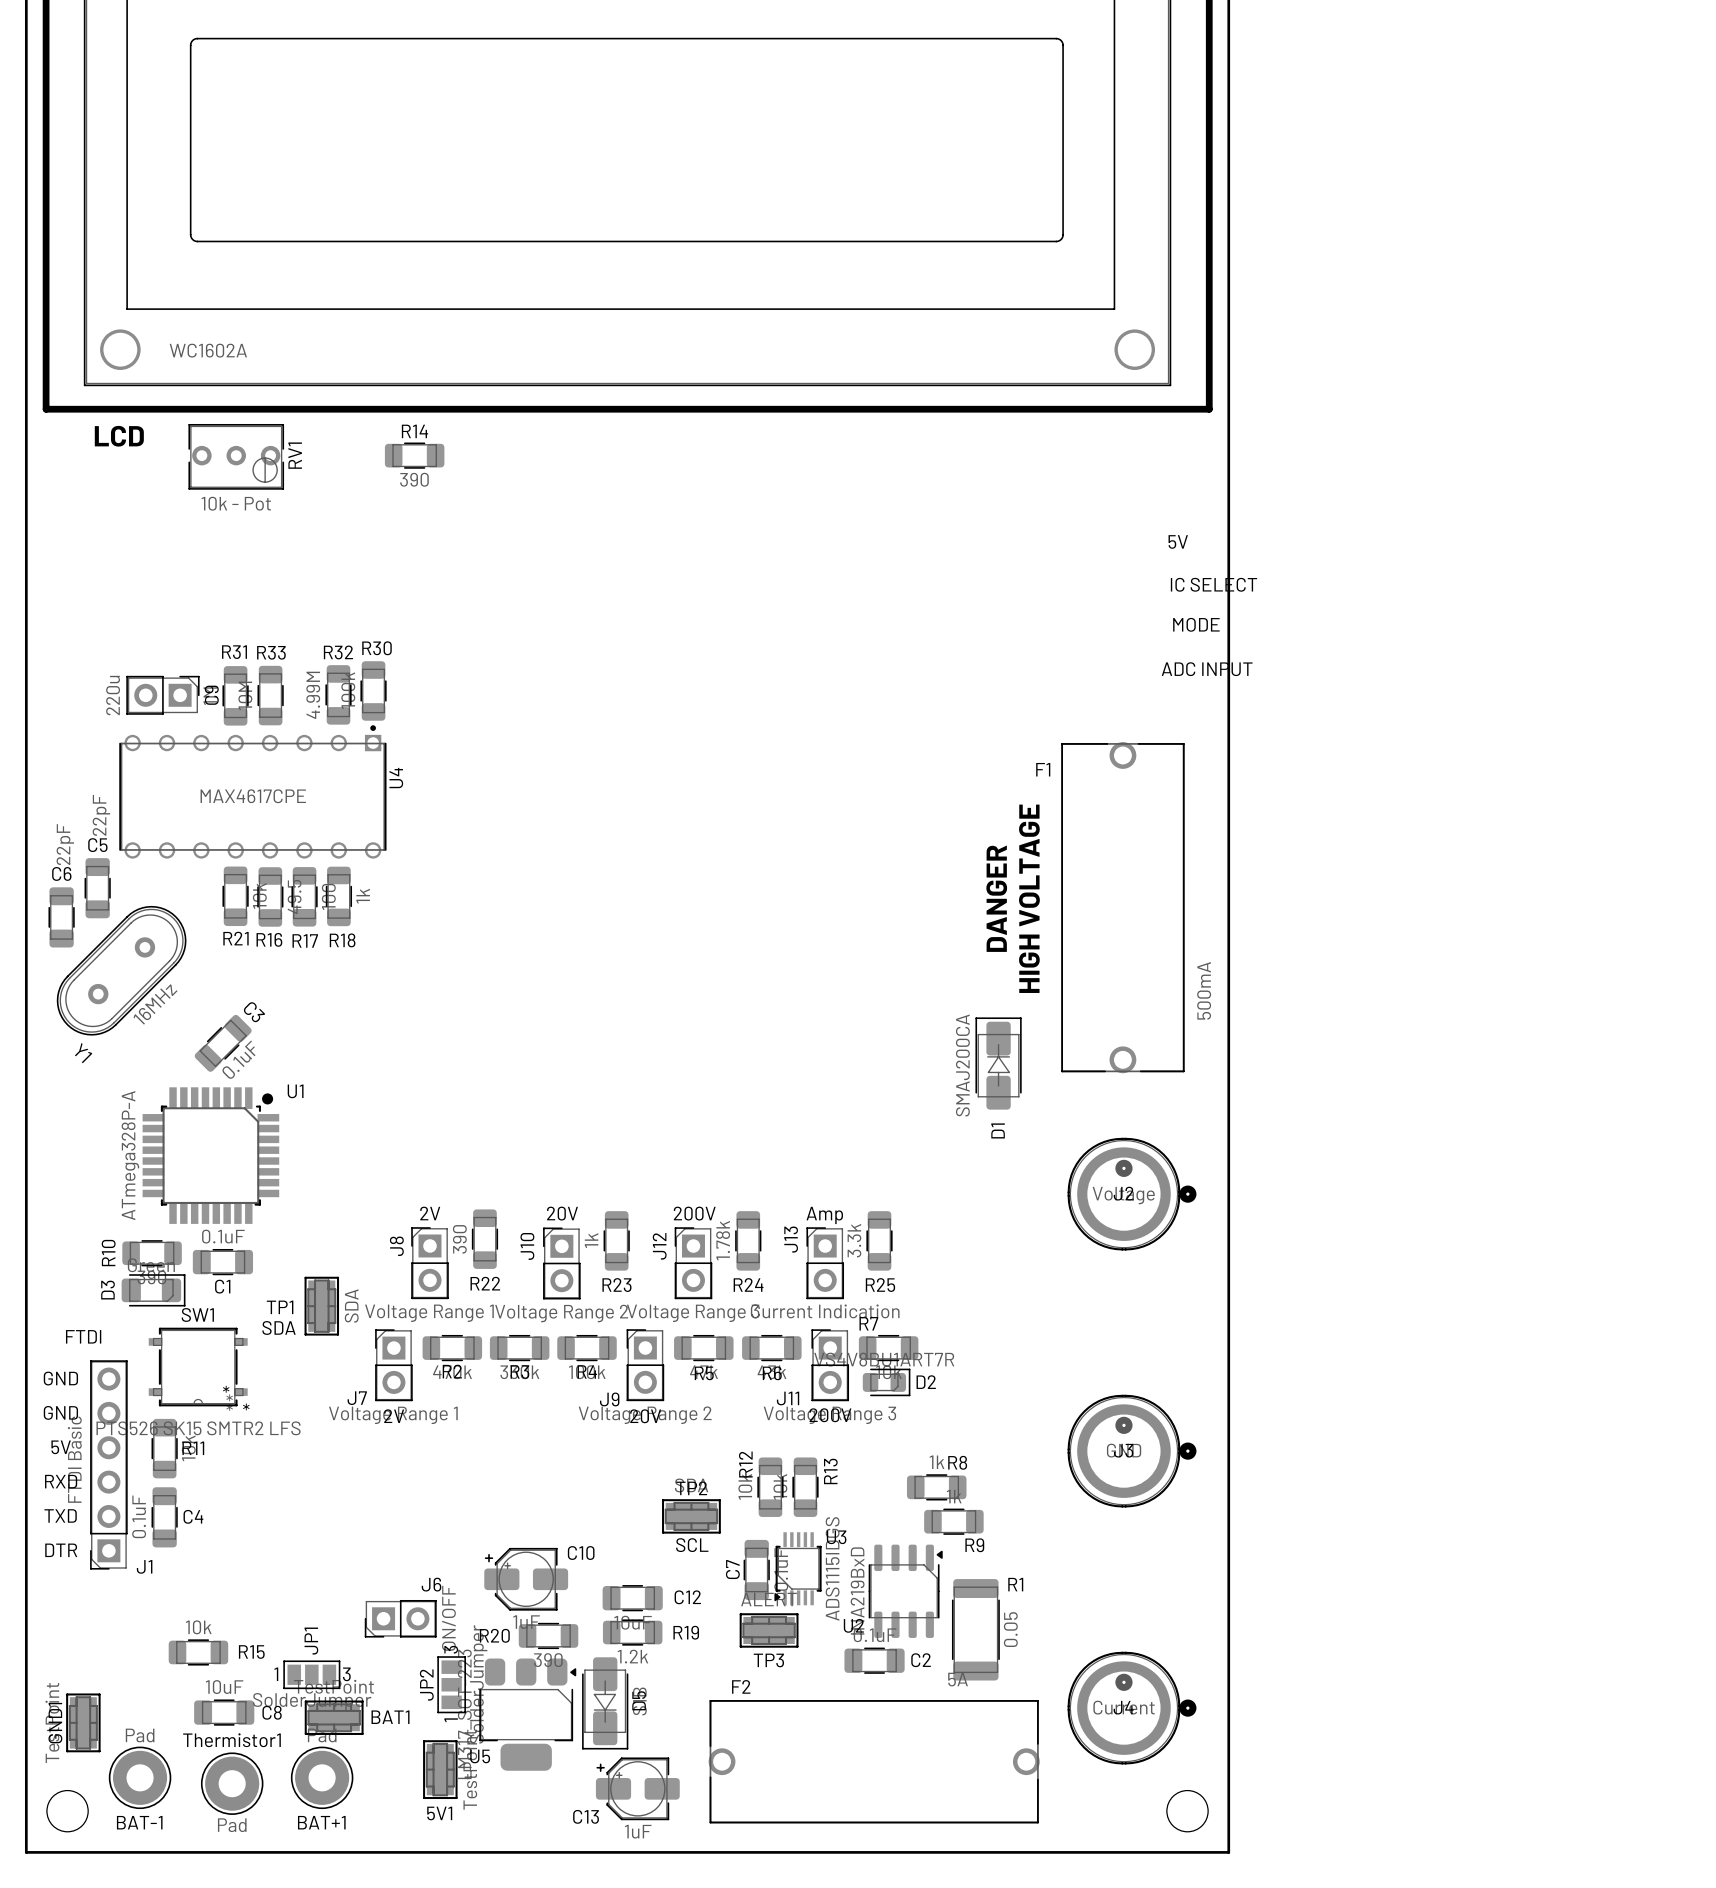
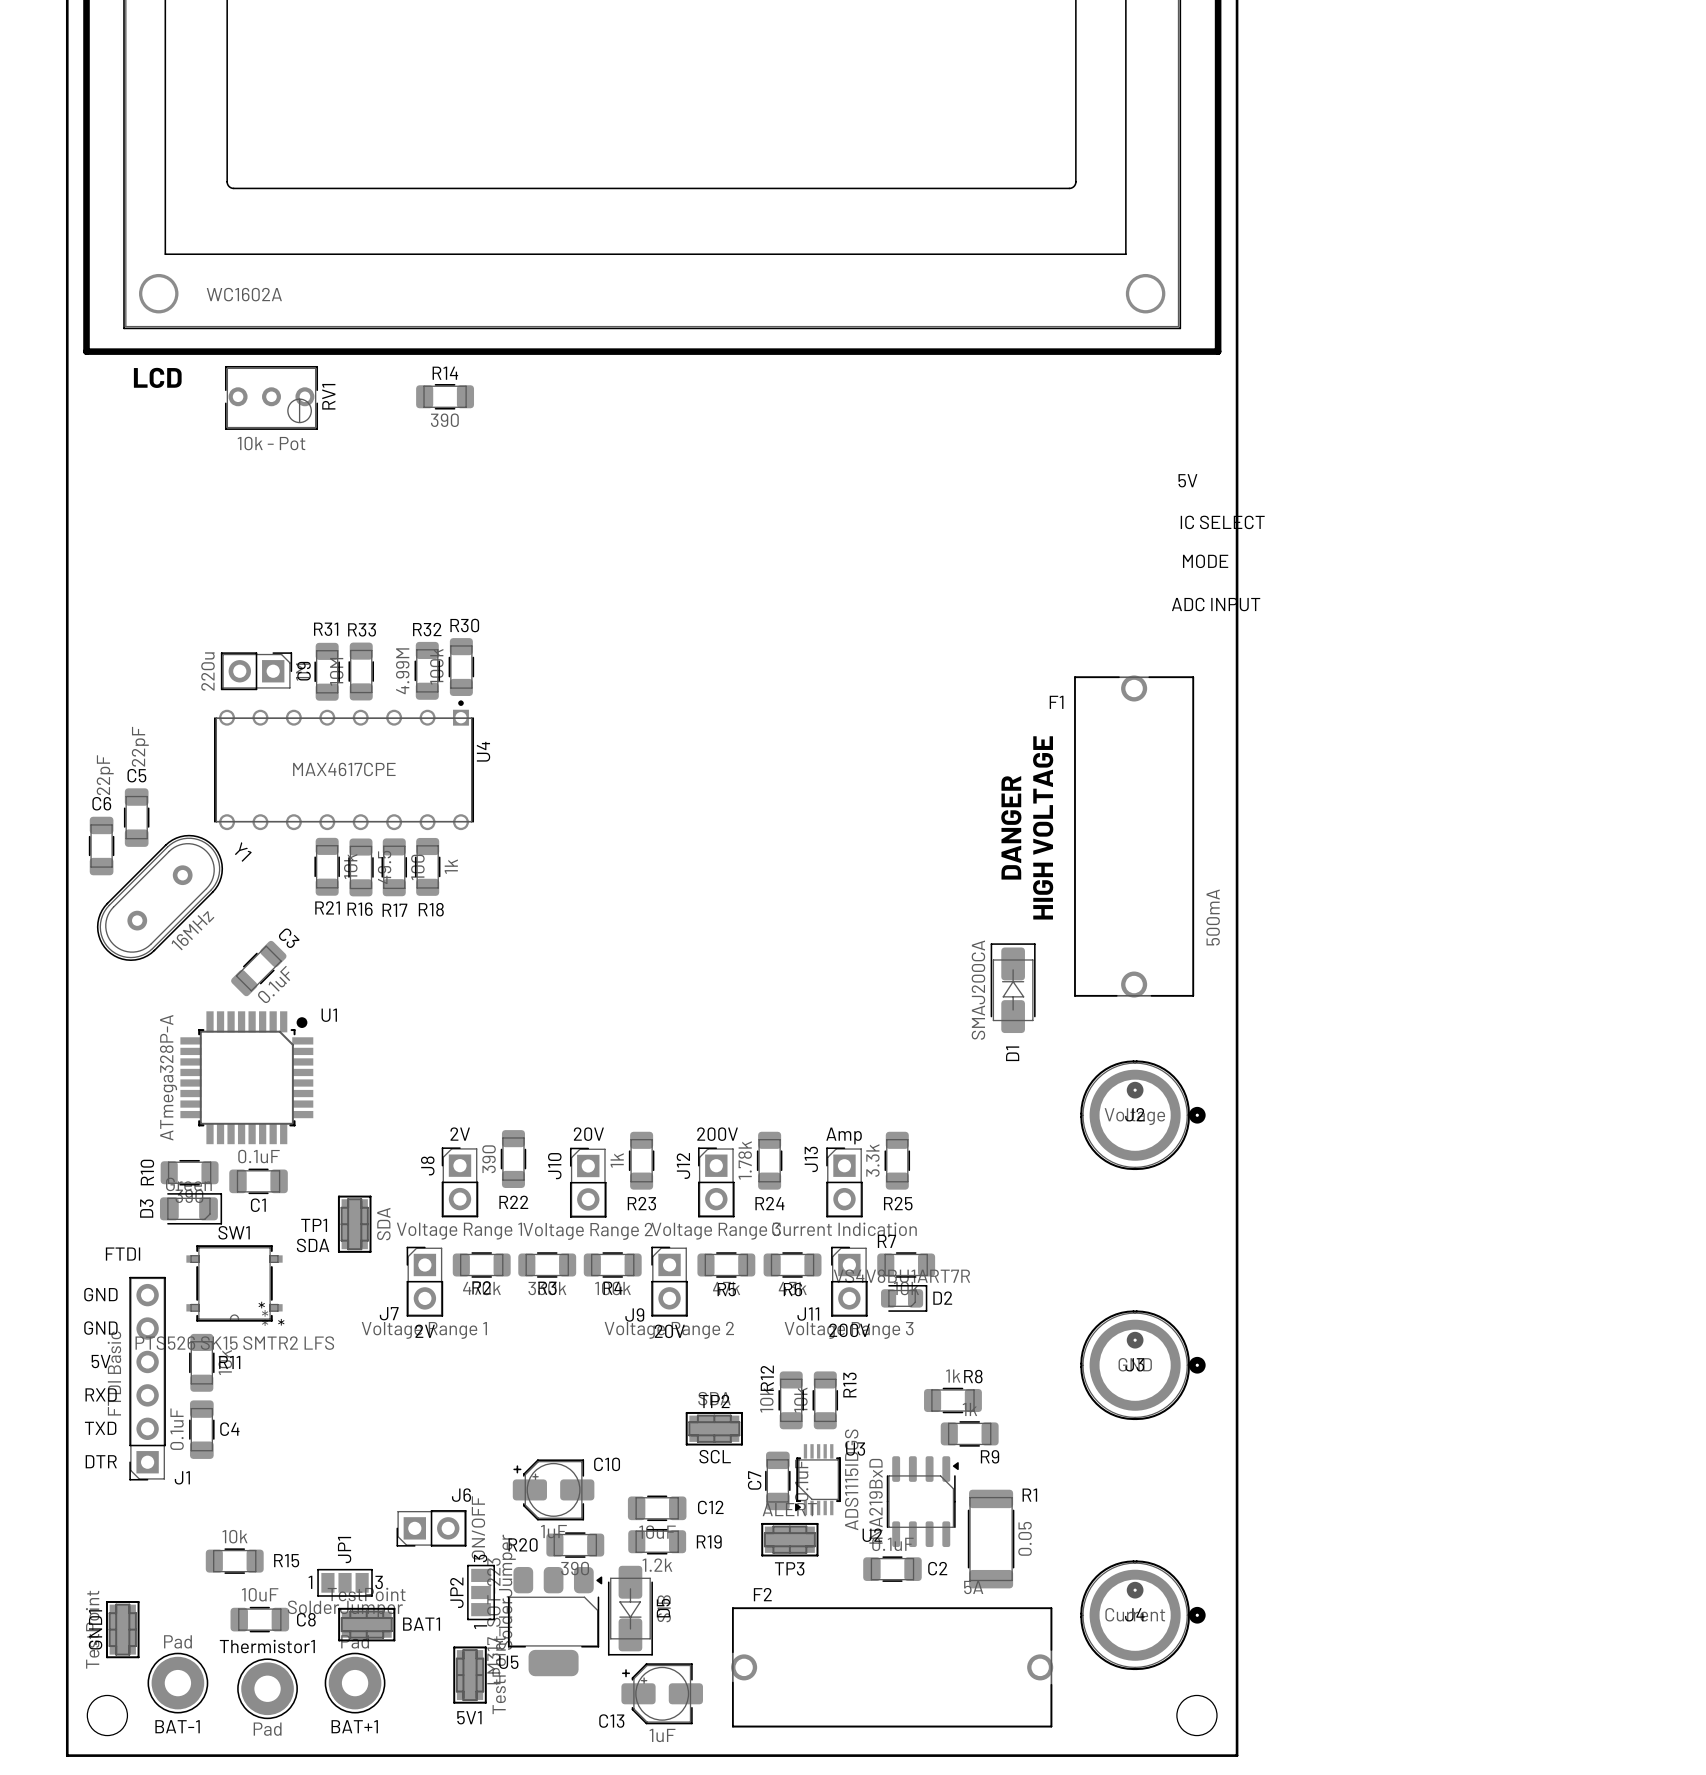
R30 position: (373, 690) -> (461, 667)
R32 position: (338, 694) -> (427, 670)
C9 position: (162, 695) -> (256, 671)
R31 position: (235, 695) -> (327, 671)
R33 position: (270, 695) -> (361, 671)
U4 position: (252, 792) -> (344, 765)
R21 position: (235, 896) -> (327, 866)
R16 position: (270, 896) -> (360, 867)
R17 position: (304, 896) -> (394, 867)
R18 position: (338, 896) -> (427, 866)
Y1 name position: Y1 (83, 1053) -> Y1 (243, 851)

